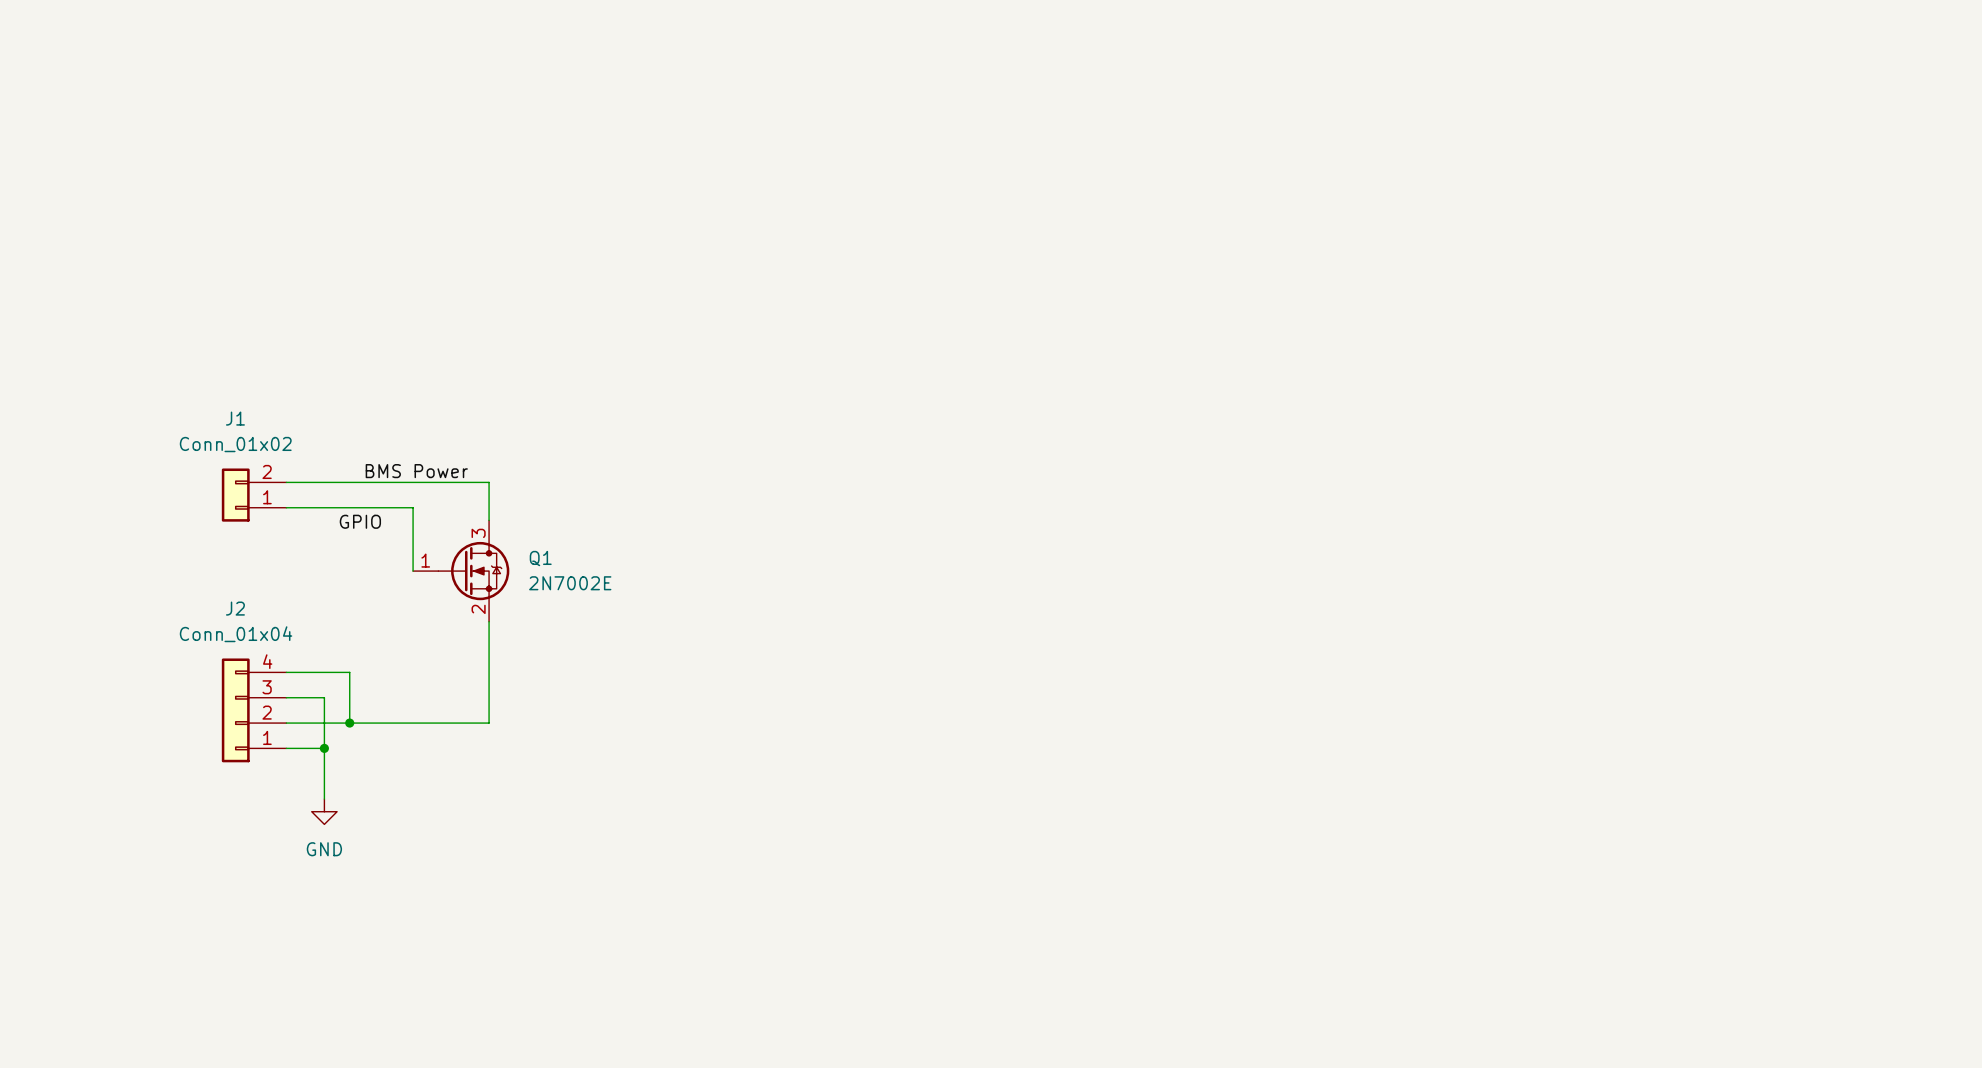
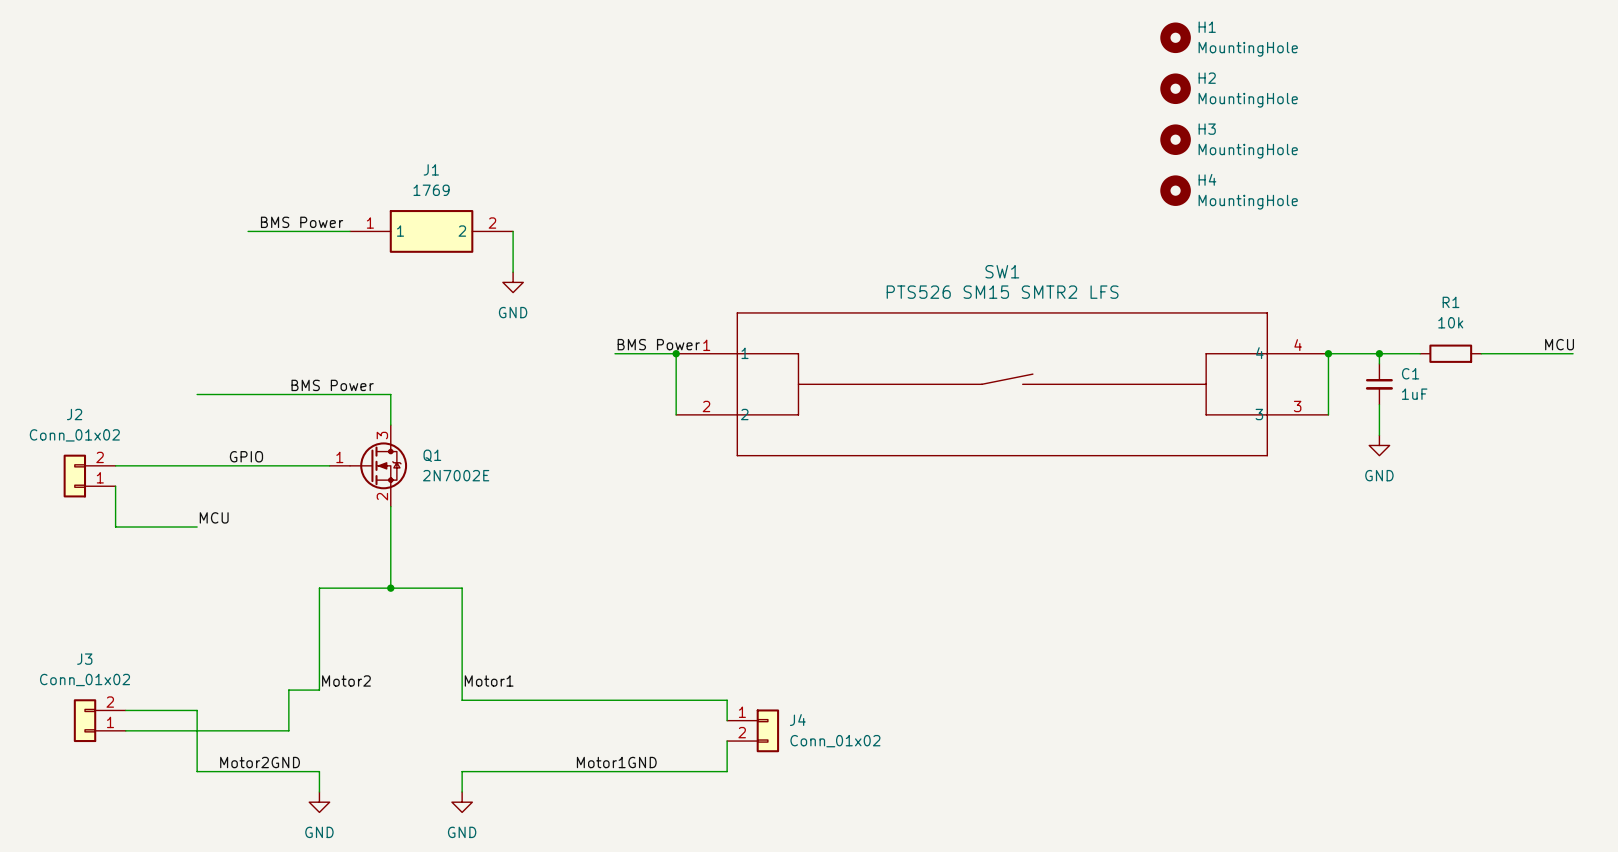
H1: none -> MountingHole (1175, 37)
H2: none -> MountingHole (1175, 88)
H3: none -> MountingHole (1175, 139)
H4: none -> MountingHole (1175, 190)
label: none -> BMS Power (302, 222)
wire: none -> (248, 231) (350, 231)
wire: none -> (513, 231) (513, 272)
power symbol: none -> GND (513, 282)
label: none -> BMS Power (658, 344)
label: none -> MCU (1559, 344)
wire: none -> (615, 353) (676, 353) (676, 414)
junction: none -> (676, 353)
junction: none -> (1328, 353)
wire: none -> (1379, 353) (1379, 363)
junction: none -> (1379, 353)
wire: none -> (1420, 353) (1328, 353) (1328, 414)
R1: none -> 10k (1450, 353)
wire: none -> (1481, 353) (1573, 353)
J1 value: Conn_01x02 (235, 444) -> 1769 (431, 190)
J1 symbol: [221, 468, 287, 522] -> [350, 210, 514, 253]
SW1: none -> PTS526 SM15 SMTR2 LFS (1002, 384)
C1: none -> 1uF (1379, 384)
wire: none -> (1379, 404) (1379, 435)
wire: (286, 507) (413, 507) (413, 571) -> (115, 465) (329, 465)
label position: GPIO (360, 521) -> GPIO (246, 456)
power symbol: none -> GND (1379, 445)
wire: none -> (115, 486) (115, 527) (197, 527)
J2 name position: J2 (235, 608) -> J2 (74, 414)
J2 value: Conn_01x04 (236, 634) -> Conn_01x02 (74, 435)
label: none -> MCU (214, 517)
J2 symbol: [221, 658, 287, 763] -> [63, 454, 116, 498]
wire: (286, 672) (349, 672) (349, 723) -> none
wire: (286, 697) (324, 697) (324, 799) -> none
wire: (286, 723) (400, 723) -> (125, 730) (288, 730) (288, 690) (319, 690) (319, 588)
junction: (349, 723) -> none
wire: none -> (390, 588) (462, 588) (462, 700) (727, 700) (727, 720)
junction: none -> (390, 588)
wire: (286, 748) (324, 748) -> none
junction: (324, 748) -> none
power symbol: GND (324, 811) -> none
label: none -> Motor2 (346, 680)
label: none -> Motor1 (489, 680)
wire: none -> (125, 710) (197, 710) (197, 771) (319, 771) (319, 791)
J3: none -> Conn_01x02 (99, 720)
J4: none -> Conn_01x02 (753, 730)
wire: none -> (727, 741) (727, 771) (462, 771) (462, 791)
label: none -> Motor2GND (260, 762)
label: none -> Motor1GND (616, 762)
power symbol: none -> GND (319, 802)
power symbol: none -> GND (462, 802)

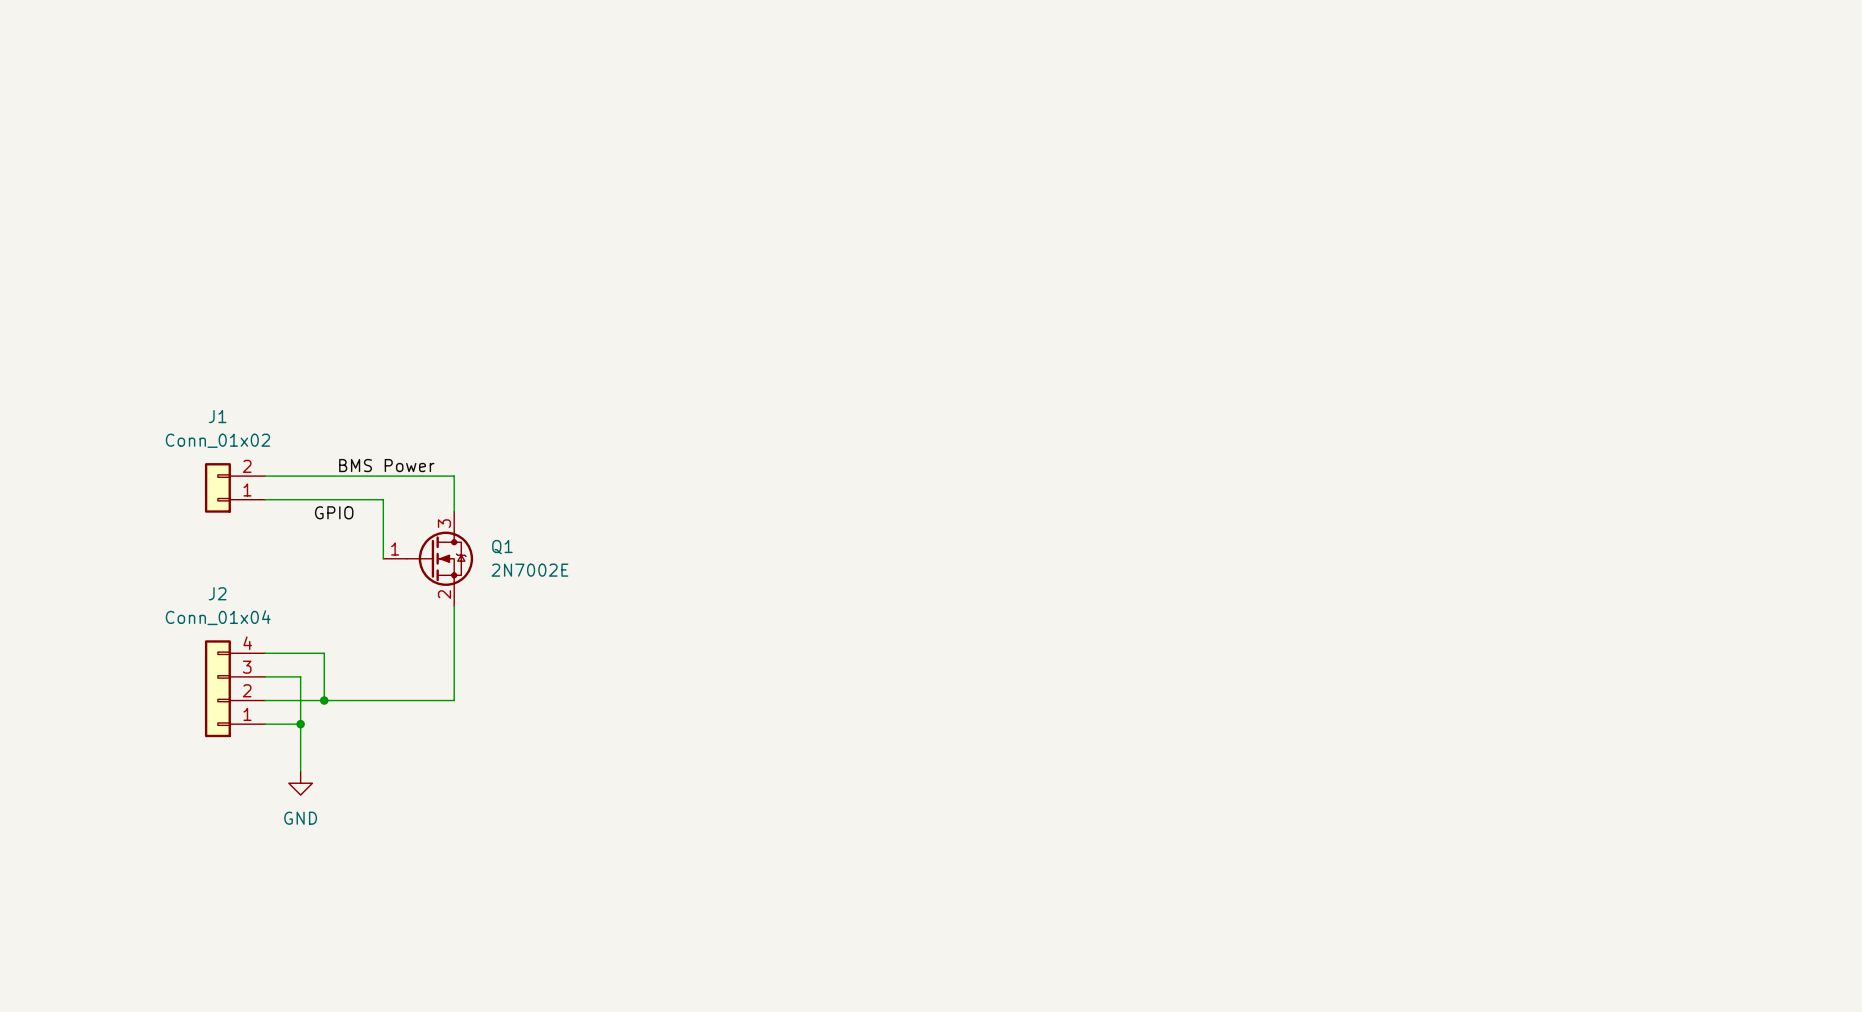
H1: MountingHole (1175, 37) -> none
H2: MountingHole (1175, 88) -> none
H3: MountingHole (1175, 139) -> none
J1 value: 1769 (431, 190) -> Conn_01x02 (217, 440)
H4: MountingHole (1175, 190) -> none
J1 symbol: [350, 210, 514, 253] -> [204, 463, 266, 513]
label: BMS Power (302, 222) -> none
wire: (248, 231) (350, 231) -> none
wire: (513, 231) (513, 272) -> none
power symbol: GND (513, 282) -> none
label: BMS Power (658, 344) -> none
label: MCU (1559, 344) -> none
wire: (615, 353) (676, 353) (676, 414) -> none
junction: (676, 353) -> none
junction: (1328, 353) -> none
wire: (1379, 353) (1379, 363) -> none
junction: (1379, 353) -> none
wire: (1420, 353) (1328, 353) (1328, 414) -> none
R1: 10k (1450, 353) -> none
wire: (1481, 353) (1573, 353) -> none
SW1: PTS526 SM15 SMTR2 LFS (1002, 384) -> none
C1: 1uF (1379, 384) -> none
wire: (1379, 404) (1379, 435) -> none
J2 name position: J2 (74, 414) -> J2 (217, 593)
J2 value: Conn_01x02 (74, 435) -> Conn_01x04 (218, 617)
power symbol: GND (1379, 445) -> none
J2 symbol: [63, 454, 116, 498] -> [204, 640, 266, 738]
label position: GPIO (246, 456) -> GPIO (334, 512)
wire: (115, 465) (329, 465) -> (265, 499) (383, 499) (383, 558)
wire: (115, 486) (115, 527) (197, 527) -> none
label: MCU (214, 517) -> none
wire: none -> (265, 653) (324, 653) (324, 700)
wire: none -> (265, 676) (300, 676) (300, 771)
junction: none -> (324, 700)
wire: (319, 588) (319, 690) (288, 690) (288, 730) (125, 730) -> (371, 700) (265, 700)
wire: (390, 588) (462, 588) (462, 700) (727, 700) (727, 720) -> none
junction: (390, 588) -> none
wire: none -> (265, 724) (300, 724)
junction: none -> (300, 724)
power symbol: none -> GND (300, 783)
label: Motor2 (346, 680) -> none
label: Motor1 (489, 680) -> none
wire: (125, 710) (197, 710) (197, 771) (319, 771) (319, 791) -> none
J3: Conn_01x02 (99, 720) -> none
J4: Conn_01x02 (753, 730) -> none
wire: (727, 741) (727, 771) (462, 771) (462, 791) -> none
label: Motor2GND (260, 762) -> none
label: Motor1GND (616, 762) -> none
power symbol: GND (319, 802) -> none
power symbol: GND (462, 802) -> none

